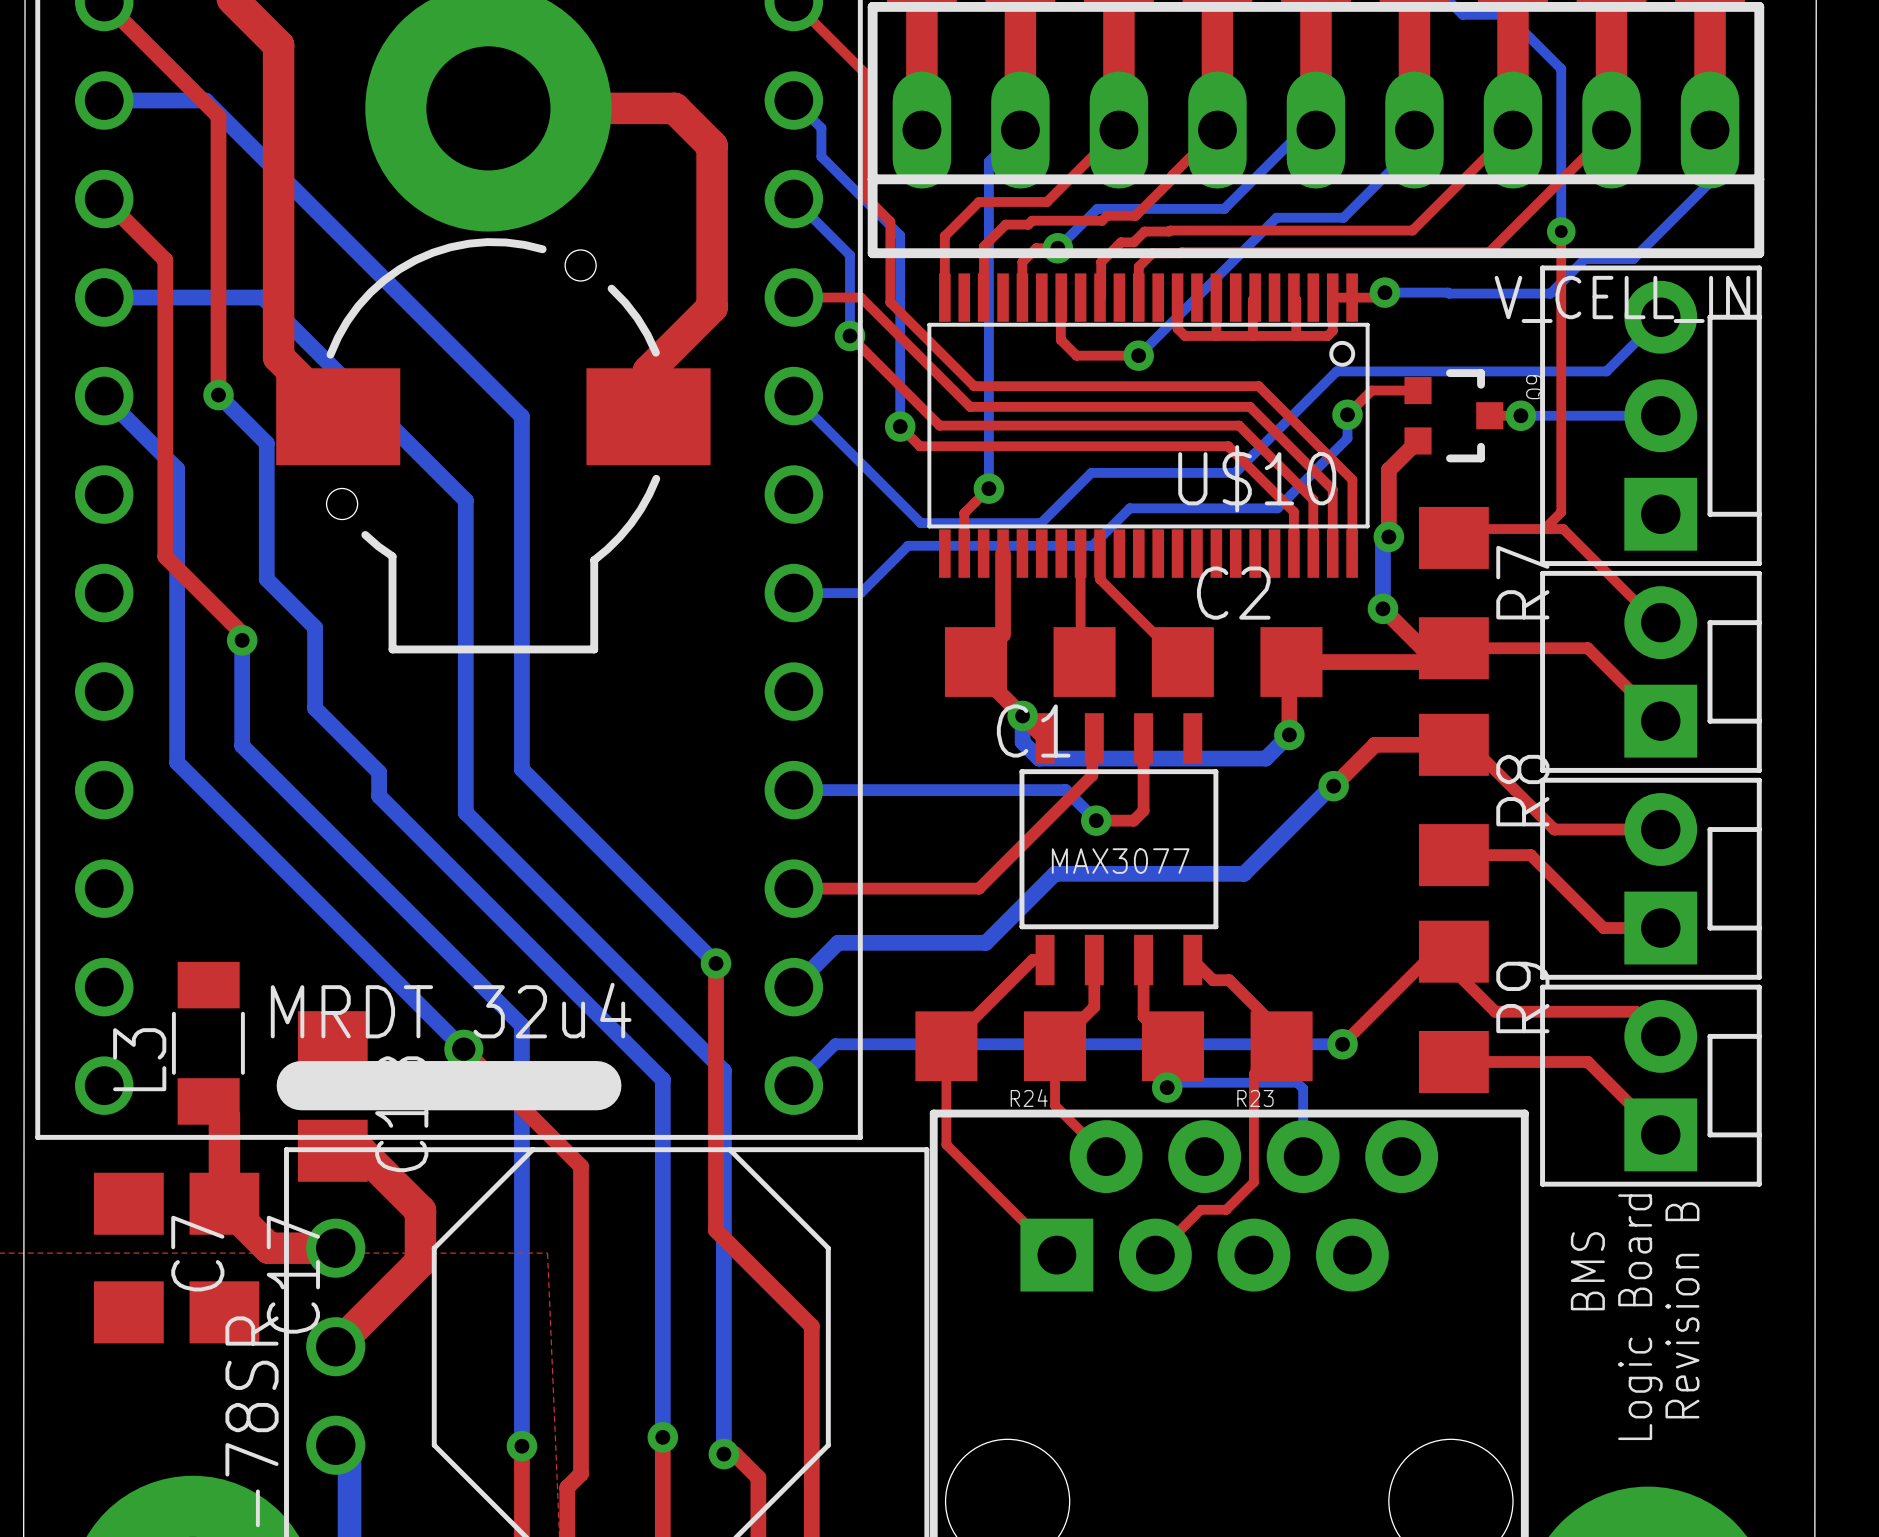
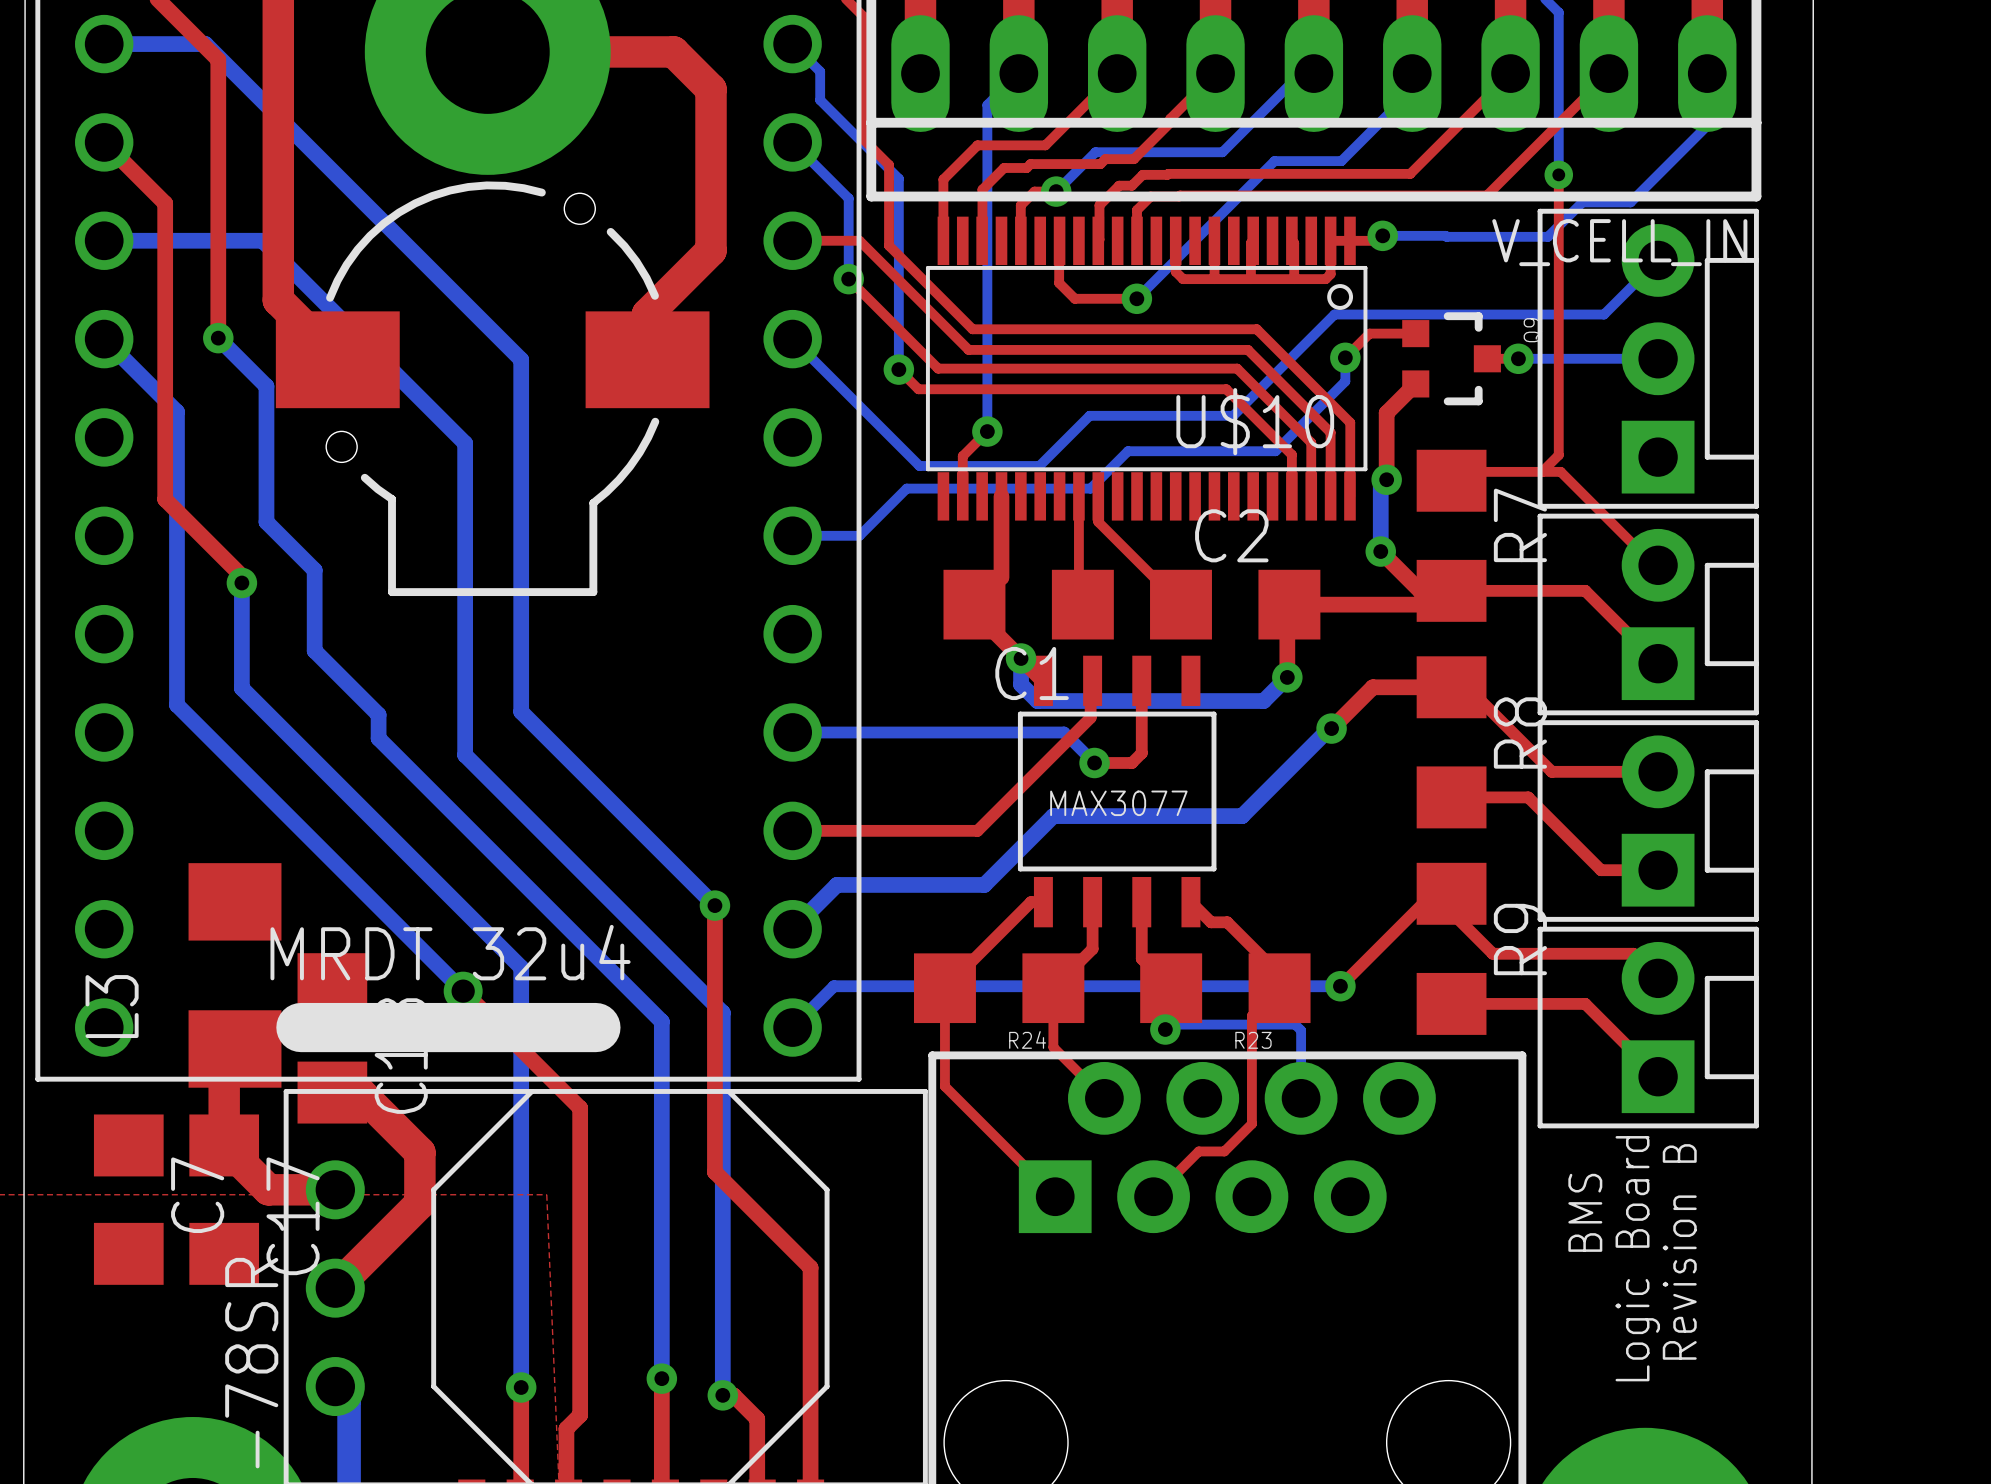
L3 footprint: [171, 961, 245, 1125] -> [188, 863, 282, 1088]

